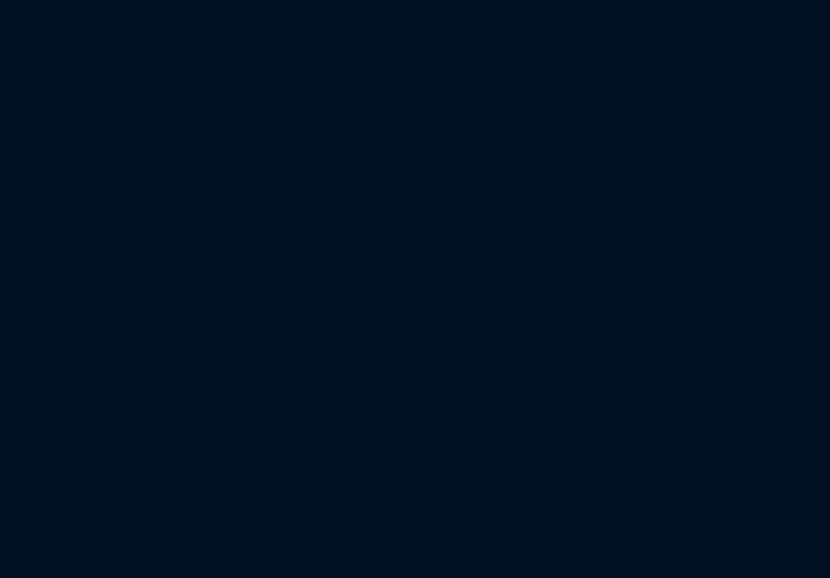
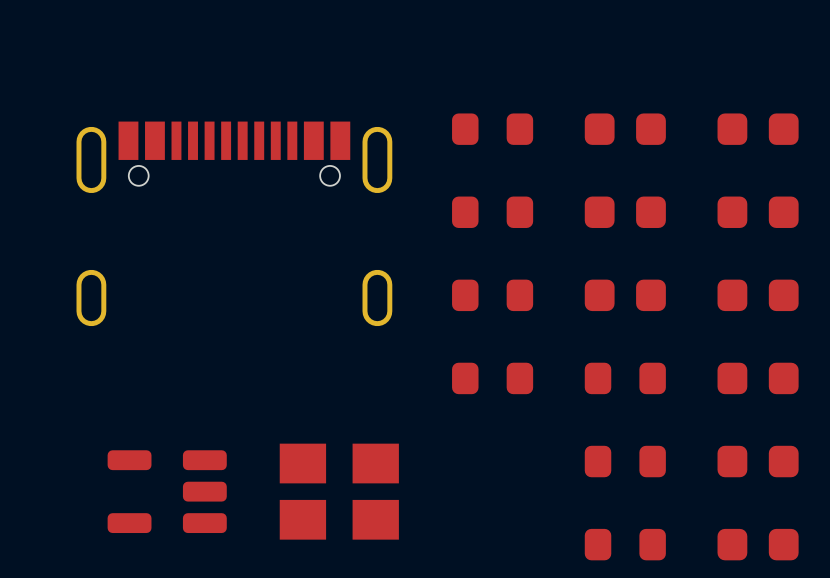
part: none -> (492, 129)
part: none -> (625, 129)
part: none -> (758, 129)
part: none -> (492, 212)
part: none -> (625, 212)
part: none -> (758, 212)
part: none -> (234, 223)
part: none -> (492, 295)
part: none -> (625, 295)
part: none -> (758, 295)
part: none -> (492, 378)
part: none -> (625, 378)
part: none -> (758, 378)
part: none -> (625, 461)
part: none -> (758, 461)
part: none -> (167, 491)
part: none -> (339, 491)
part: none -> (625, 544)
part: none -> (758, 544)

